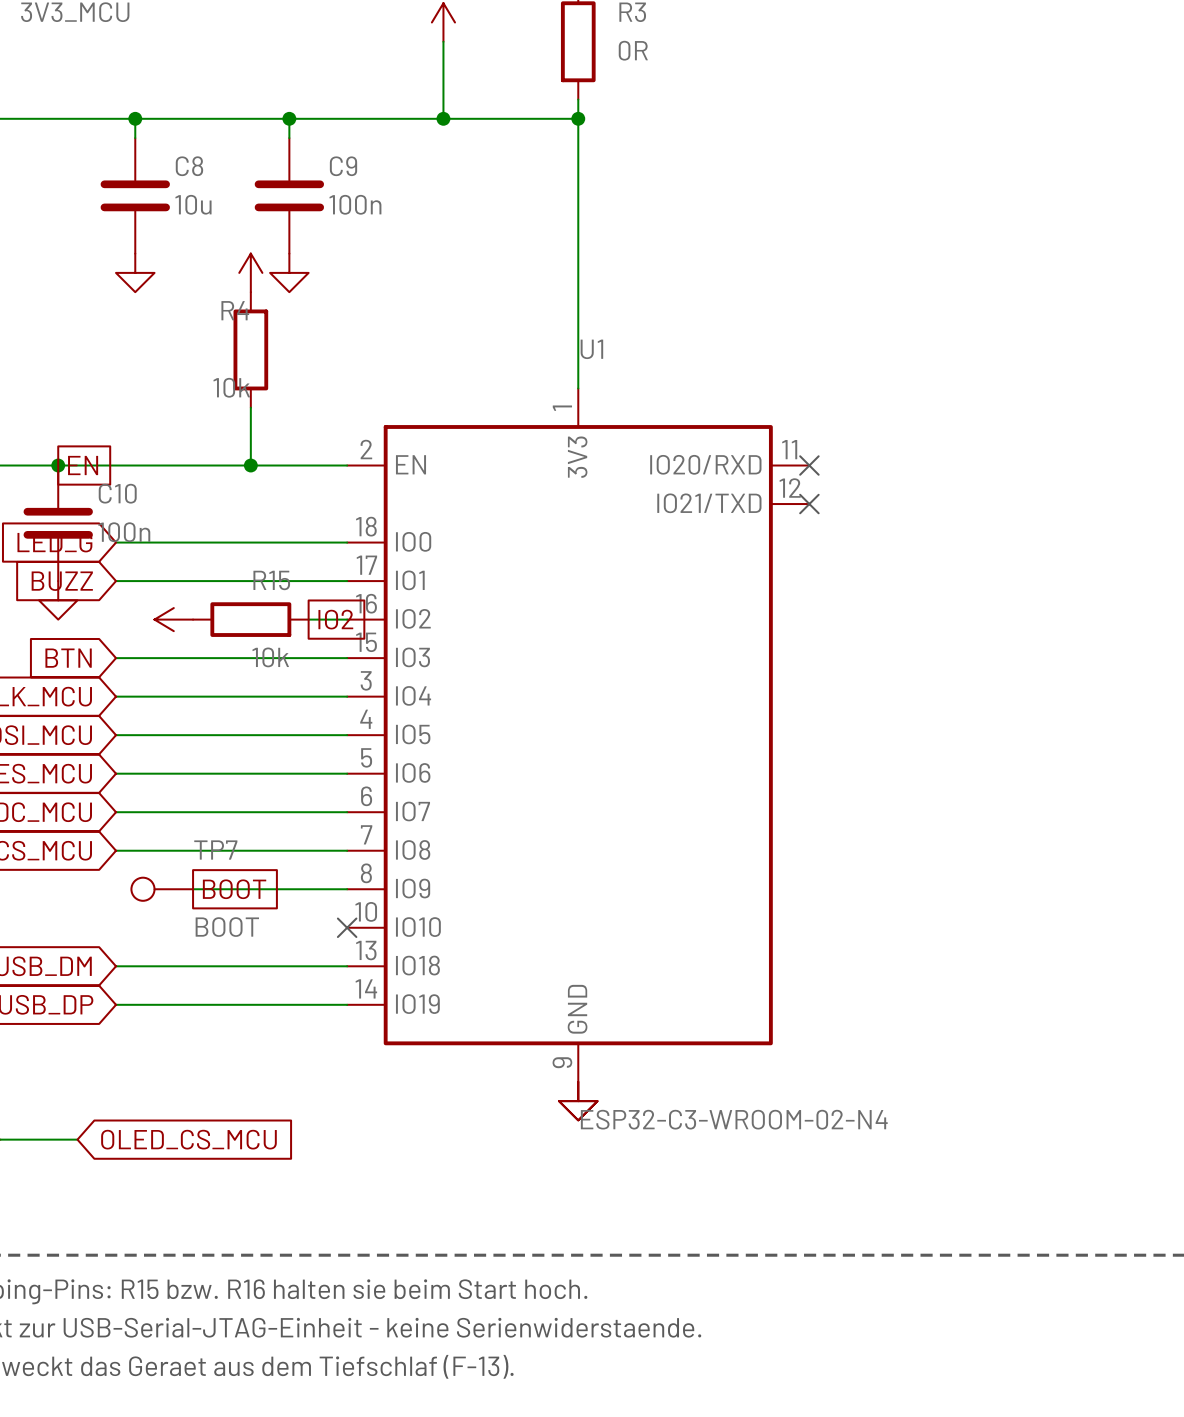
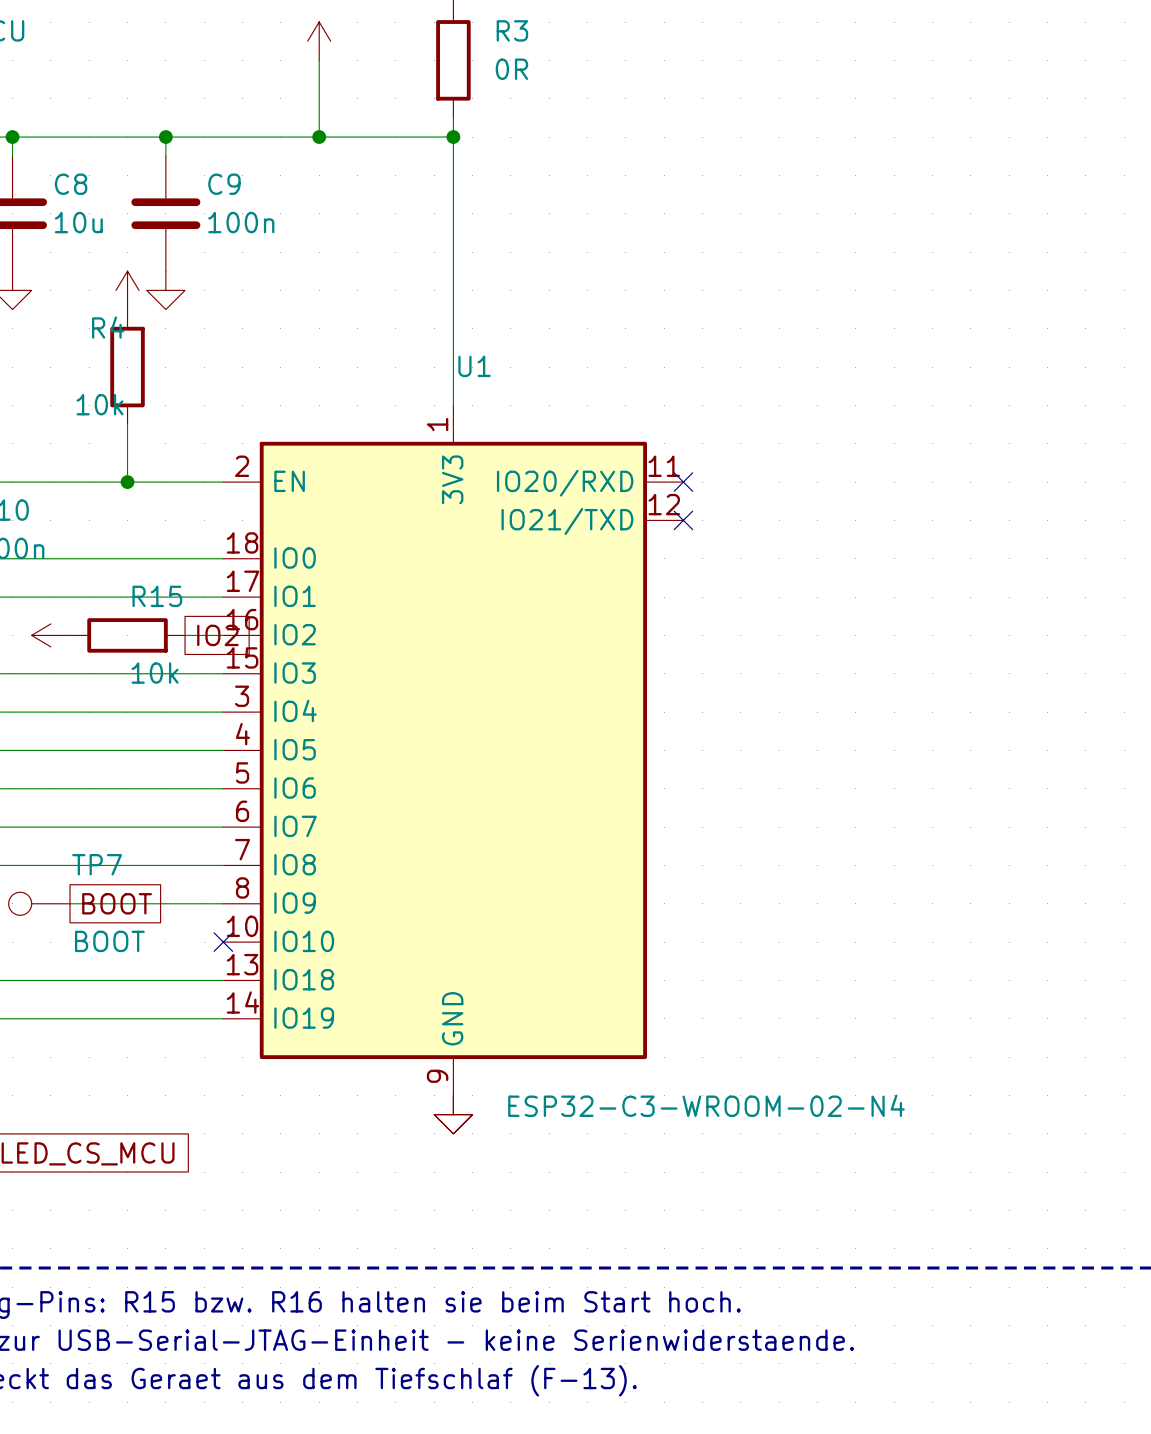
U1 value position: ESP32-C3-WROOM-02-N4 (734, 1119) -> ESP32-C3-WROOM-02-N4 (706, 1105)

